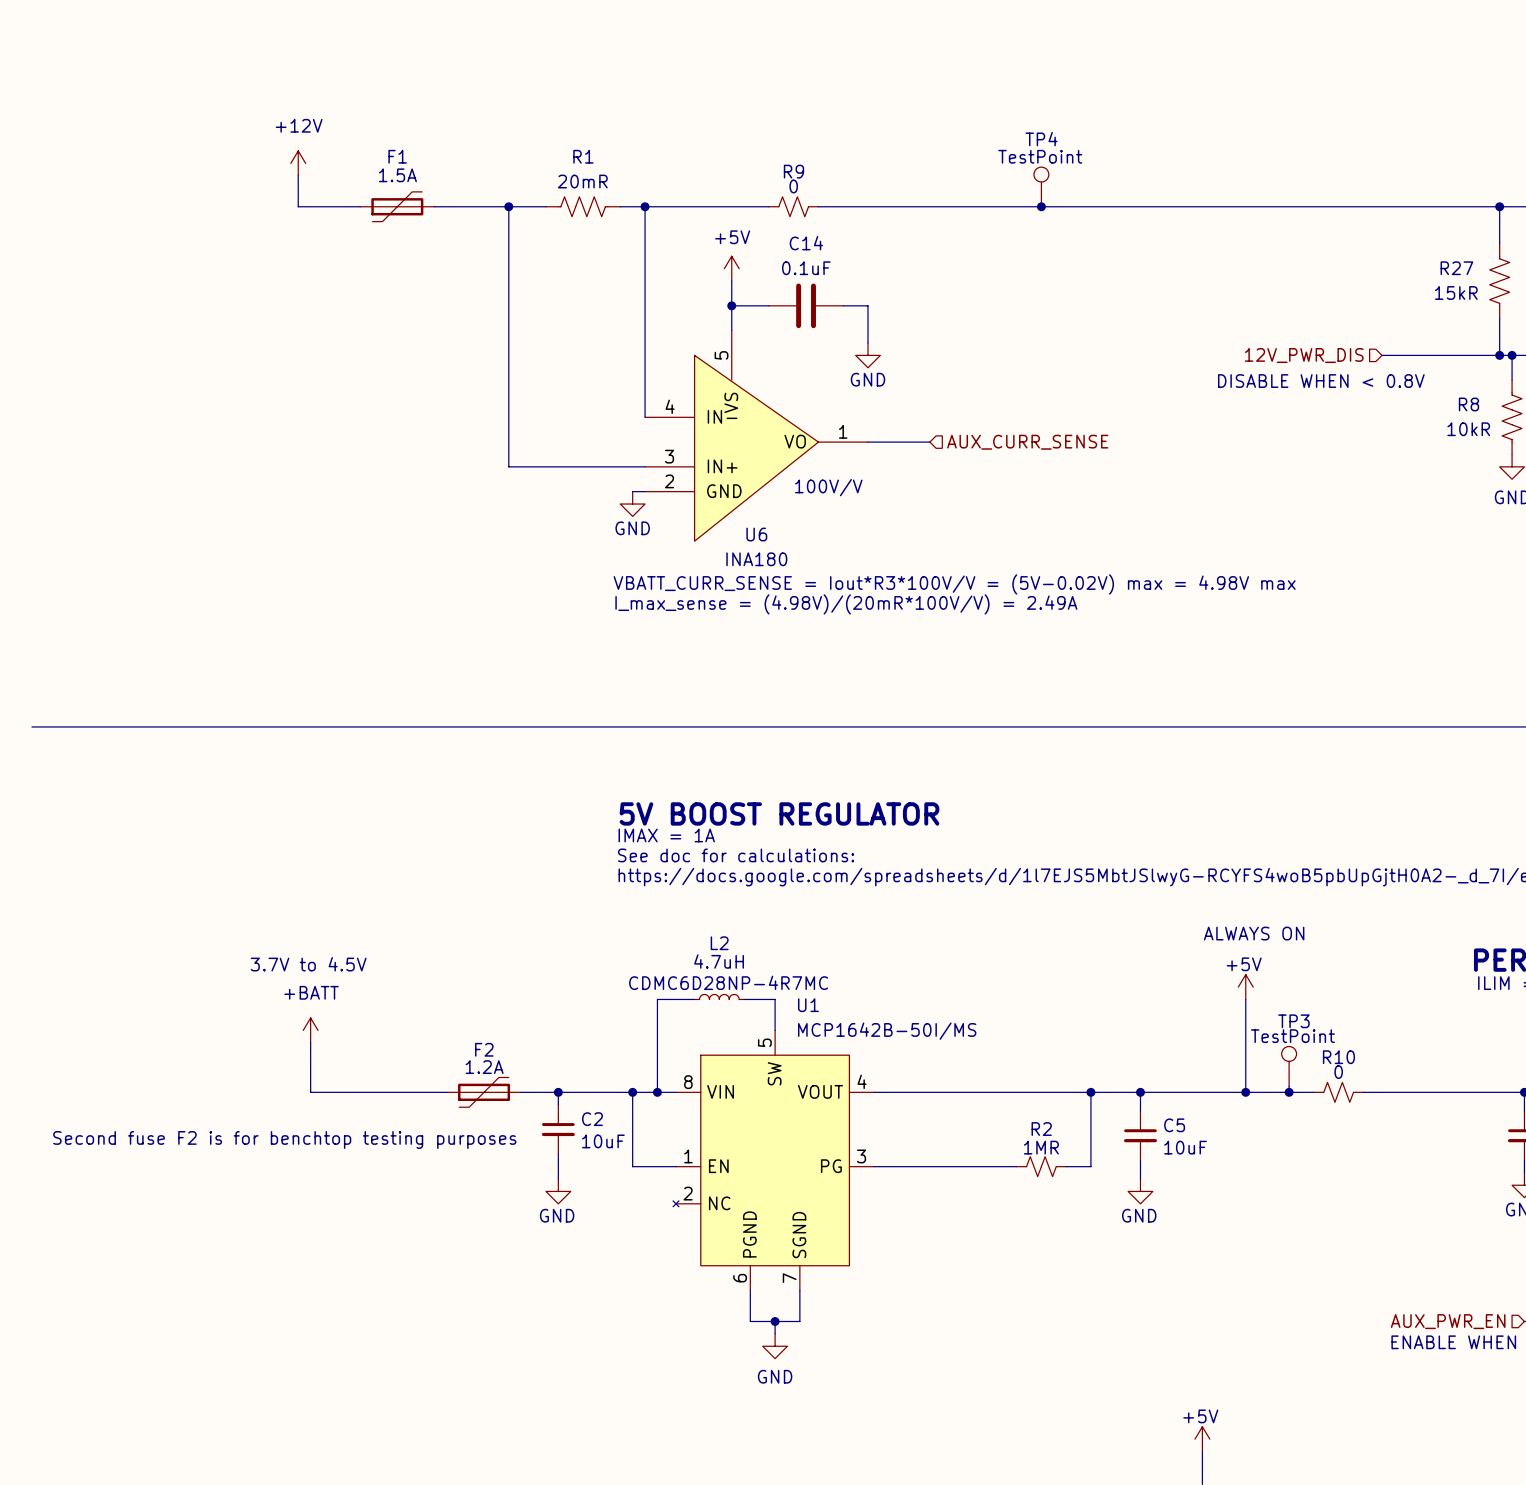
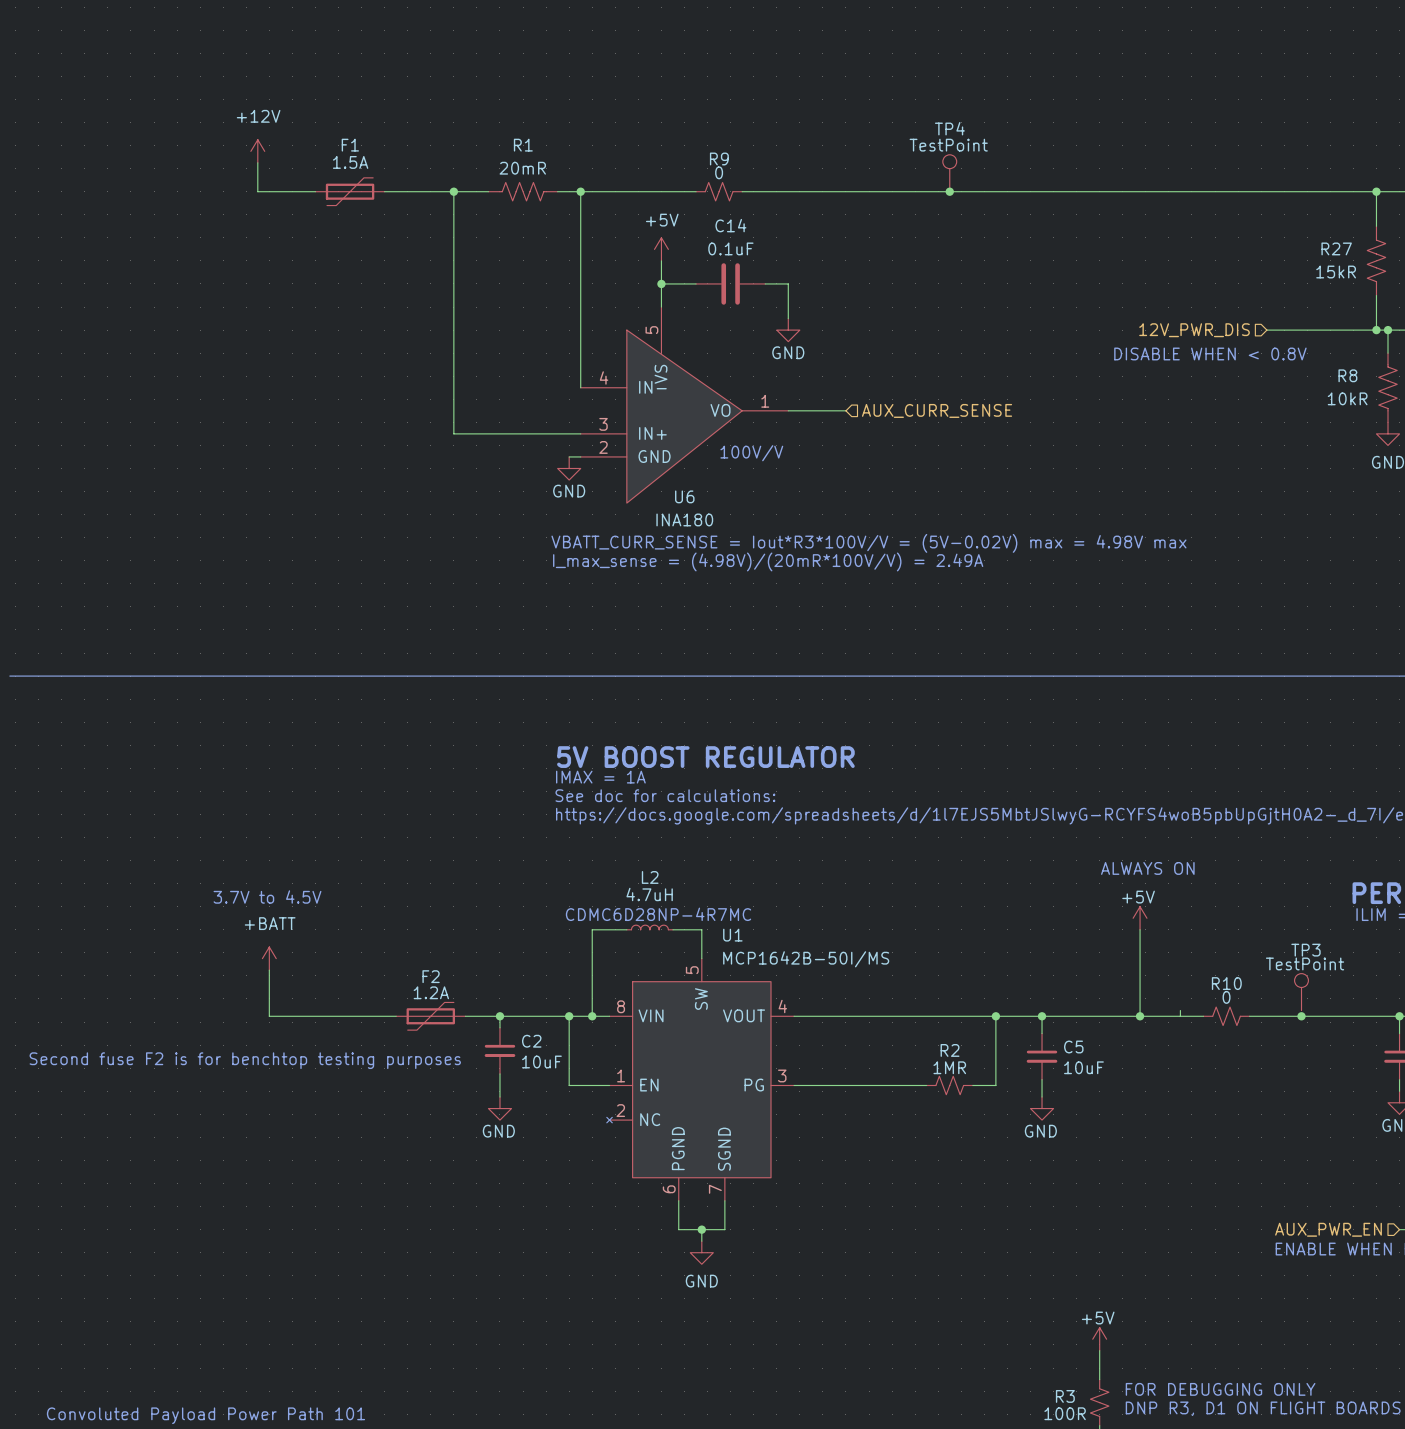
TP3 position: (1289, 1066) -> (1301, 992)
junction: (1289, 1092) -> none
junction: none -> (1301, 1016)

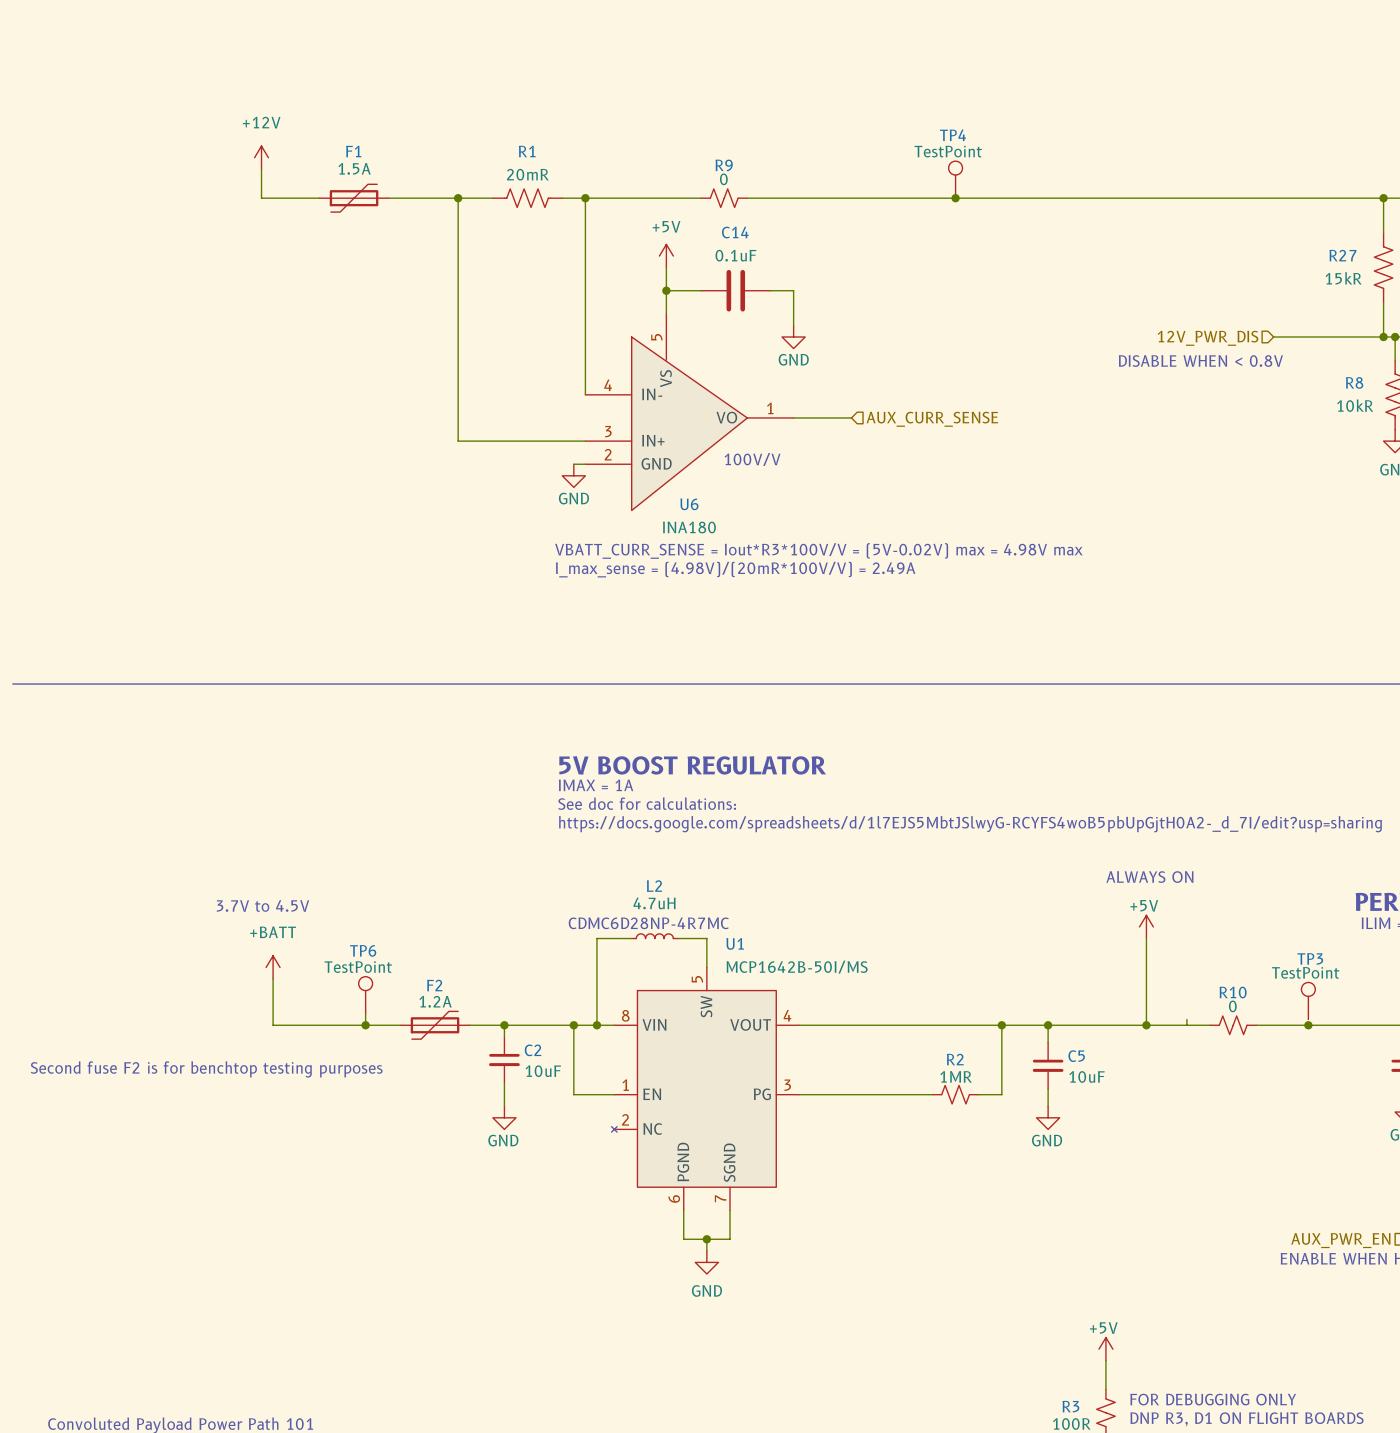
TP6: none -> TestPoint (365, 995)
wire: none -> (365, 1013) (365, 1025)
junction: none -> (365, 1025)

